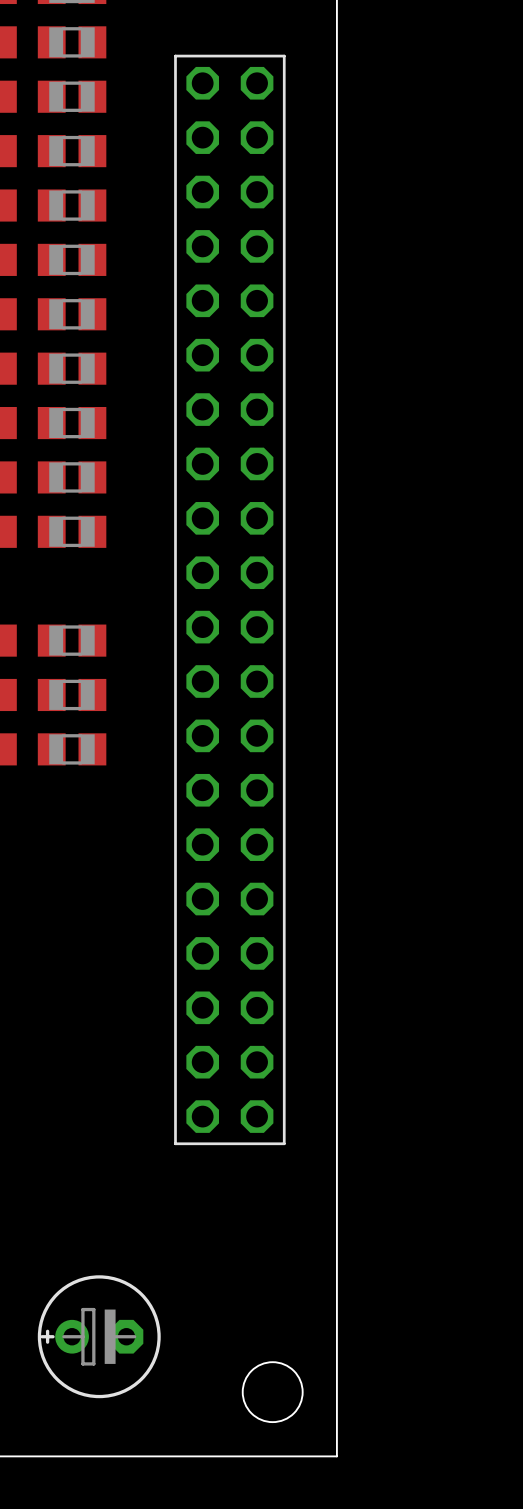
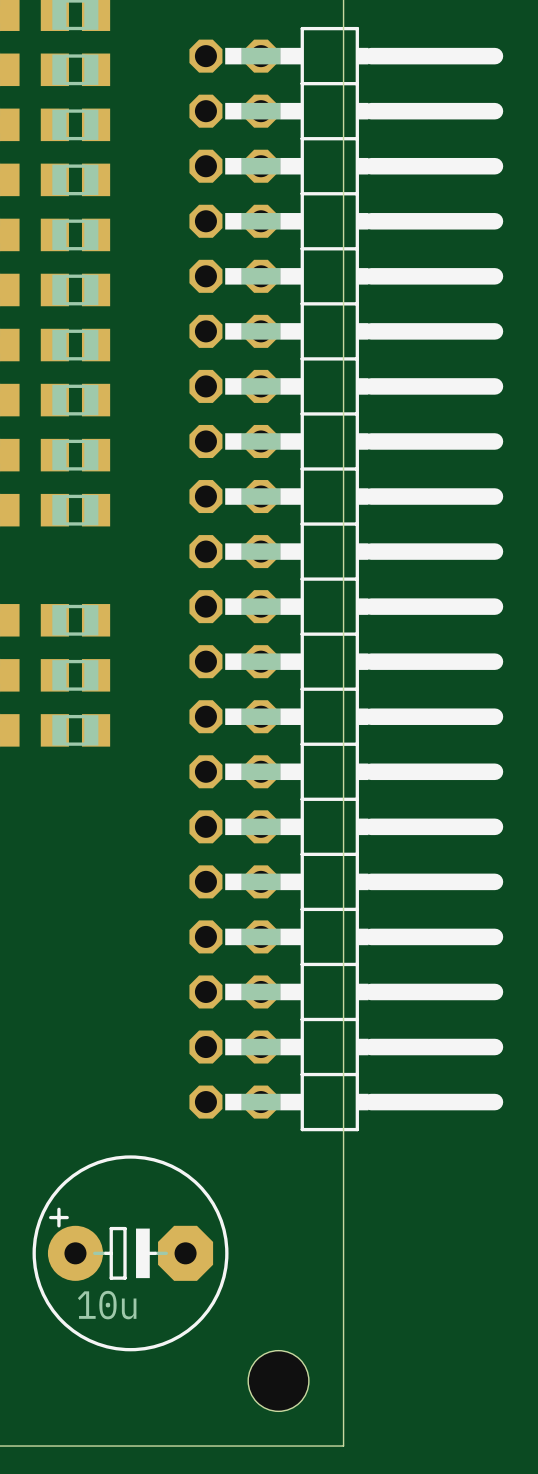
part: (229, 599) -> none
part: none -> (346, 579)
part: none -> 10u (130, 1253)
part: (99, 1336) -> none

